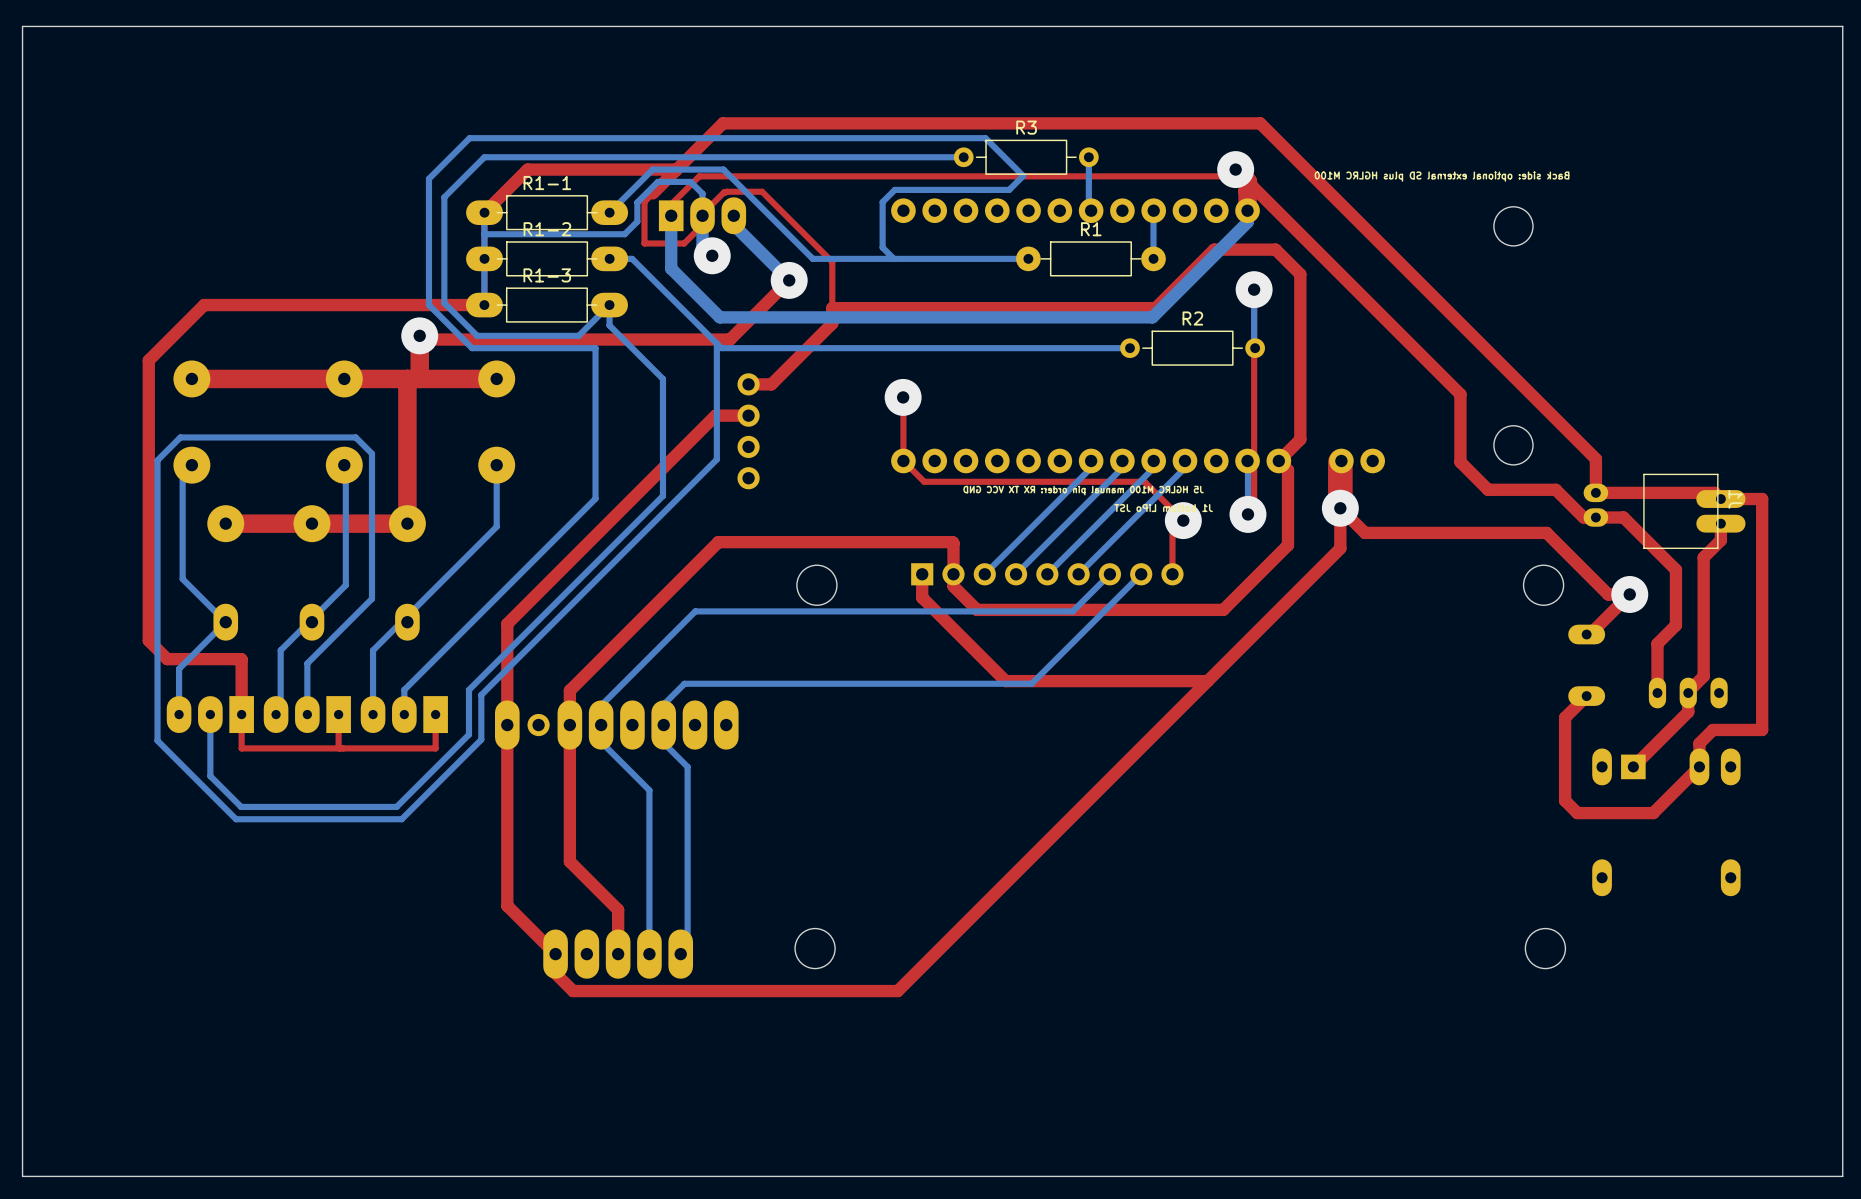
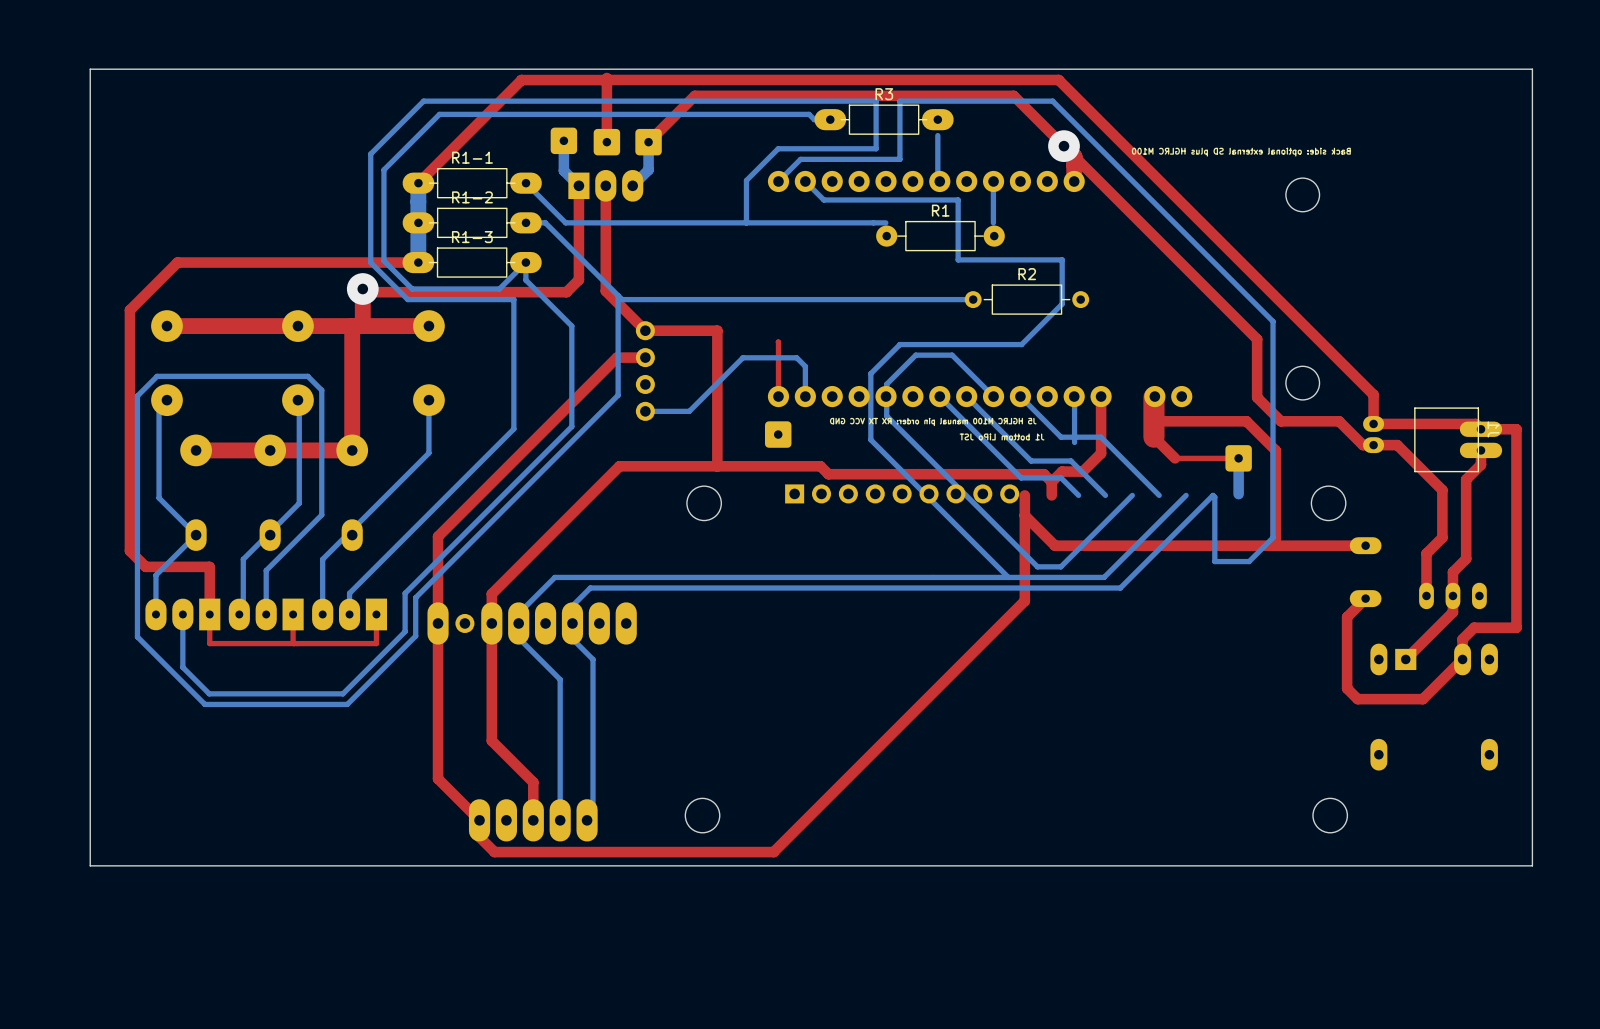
board edge: (1842, 26) (22, 26) (22, 1176) (1842, 1176) (1842, 26) -> (1532, 69) (1532, 865) (90, 865) (90, 69) (1532, 69)
top track: none -> (606, 77) (606, 142)
top track: (1260, 123) (722, 123) (644, 201) (644, 243) (684, 243) (702, 225) -> (1085, 106) (1058, 79) (608, 79)
bottom track: (469, 138) (985, 138) (1023, 175) (1009, 189) (894, 189) (882, 202) (882, 247) (893, 258) -> (405, 119) (423, 101) (876, 101) (876, 148) (778, 148) (746, 180) (746, 222)
R3 footprint: [953, 139, 1099, 175] -> [814, 104, 954, 135]
bottom track: (963, 157) (484, 157) -> (830, 119) (814, 119) (809, 114) (439, 114) (418, 135)
part: none -> (563, 140)
part: none -> (606, 142)
top track: none -> (648, 142) (694, 95) (1013, 95) (1063, 146)
part: none -> (648, 142)
top track: (527, 169) (676, 170) -> (455, 146) (521, 80) (608, 80)
top track: (1228, 176) (699, 176) (671, 204) -> none
bottom track: none -> (805, 181) (823, 200) (958, 200) (958, 259) (1062, 259) (1062, 304) (1021, 344) (899, 344) (870, 373) (870, 439) (1008, 577)
bottom track: (1247, 210) (1247, 222) (1152, 317) (719, 317) (671, 268) (671, 215) -> (563, 140) (563, 170) (578, 185)
bottom track: (609, 212) (652, 169) (723, 169) (812, 258) -> (526, 183) (565, 222) (700, 222)
top track: (702, 215) (724, 192) (762, 191) (832, 261) (832, 308) -> (605, 185) (605, 291) (645, 330)
bottom track: (733, 215) (733, 225) (789, 280) -> (632, 185) (648, 169) (648, 142)
bottom track width: thin (484, 221) (484, 305) -> thick (418, 191) (418, 262)
bottom track: (484, 234) (624, 234) (637, 221) (637, 202) (657, 181) (690, 181) (702, 193) (702, 246) (712, 255) -> none
via: (712, 255) -> none
R1 position: (1090, 258) -> (940, 236)
top track: (789, 280) (730, 339) (656, 339) -> (578, 185) (578, 279) (566, 292)
via: (789, 280) -> none
top track: (1254, 289) (1254, 508) (1247, 514) -> none
bottom track: (1254, 289) (1254, 347) -> none
via: (1254, 289) -> none
top track: (832, 308) (832, 323) (771, 384) -> (717, 466) (717, 330) (665, 330)
top track: (832, 308) (1155, 308) (1214, 249) (1275, 249) (1300, 274) (1300, 439) (1278, 460) (1288, 470) (1288, 545) (1223, 609) (977, 609) (953, 586) (953, 543) -> (1051, 481) (1044, 474) (828, 474) (821, 467)
via: (903, 397) -> none
top track: (903, 460) (924, 481) (1144, 481) (1183, 520) (1172, 531) (1172, 574) -> none
bottom track: none -> (805, 396) (805, 366) (796, 357) (742, 357) (689, 411) (645, 411)
bottom track: (1091, 460) (1091, 467) (984, 574) -> (939, 396) (1021, 477) (1061, 477) (1078, 495)
bottom track: (1122, 460) (1122, 467) (1016, 574) -> (966, 396) (1031, 461) (1071, 461) (1105, 495)
bottom track: (1153, 460) (1153, 467) (1047, 574) -> (993, 396) (952, 355) (915, 355) (886, 384) (886, 416) (1037, 566) (1060, 566) (1132, 495)
bottom track: (1184, 460) (1184, 467) (1078, 574) -> (1020, 396) (1061, 437) (1101, 437) (1159, 495)
top track: none -> (1101, 396) (1101, 453) (1082, 471) (1062, 471) (1051, 481)
top track: none -> (1154, 396) (1154, 414) (1161, 421) (1246, 421) (1275, 450) (1275, 545)
part: none -> (778, 434)
top track: (1340, 508) (1340, 548) (1190, 698) -> (1024, 495) (1024, 600)
via: (1340, 508) -> none
via: (1247, 514) -> none
via: (1183, 520) -> none
top track: (1438, 532) (1546, 532) (1608, 594) (1629, 594) (1589, 634) -> none
top track width: thick (1438, 532) (1364, 532) -> thin (1238, 458) (1175, 458)
bottom track: none -> (1238, 458) (1239, 495)
part: none -> (1238, 458)
top track: none -> (1051, 481) (1051, 495)
top track: (922, 574) (922, 597) (1005, 681) (1207, 681) -> none
bottom track: (1109, 574) (1072, 611) (695, 611) (601, 705) (601, 713) -> (1186, 495) (1104, 577) (554, 577) (518, 613)
bottom track: (1141, 574) (1031, 683) -> (778, 181) (800, 159) (899, 159) (899, 101) (1052, 101) (1273, 321) (1273, 537) (1249, 561) (1214, 561) (1214, 497) (1213, 495) (1120, 588) (888, 588)
via: (1629, 594) -> none
top track: none -> (1024, 515) (1054, 545) (1365, 545)
top track: (1703, 649) (1703, 676) (1688, 691) -> (1466, 558) (1452, 572) (1452, 594)

